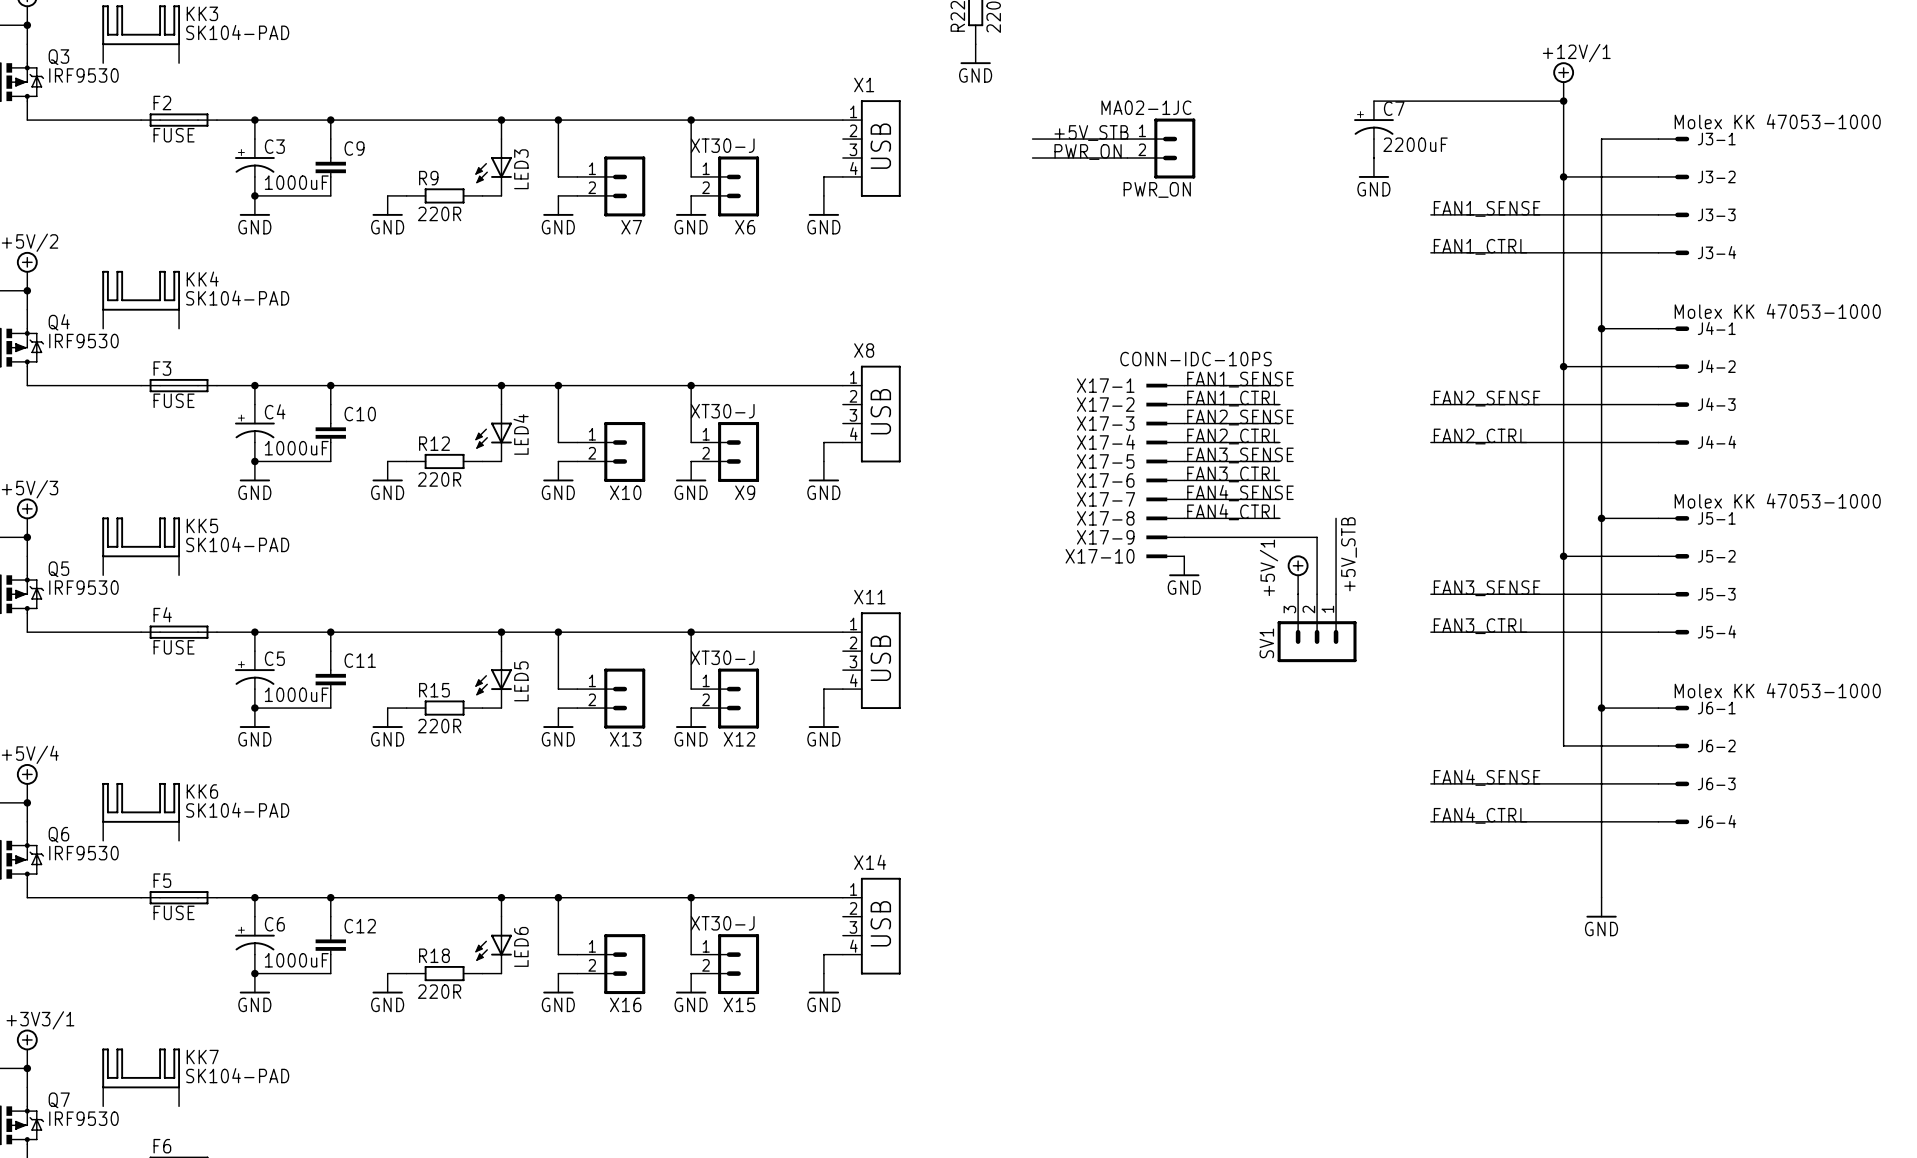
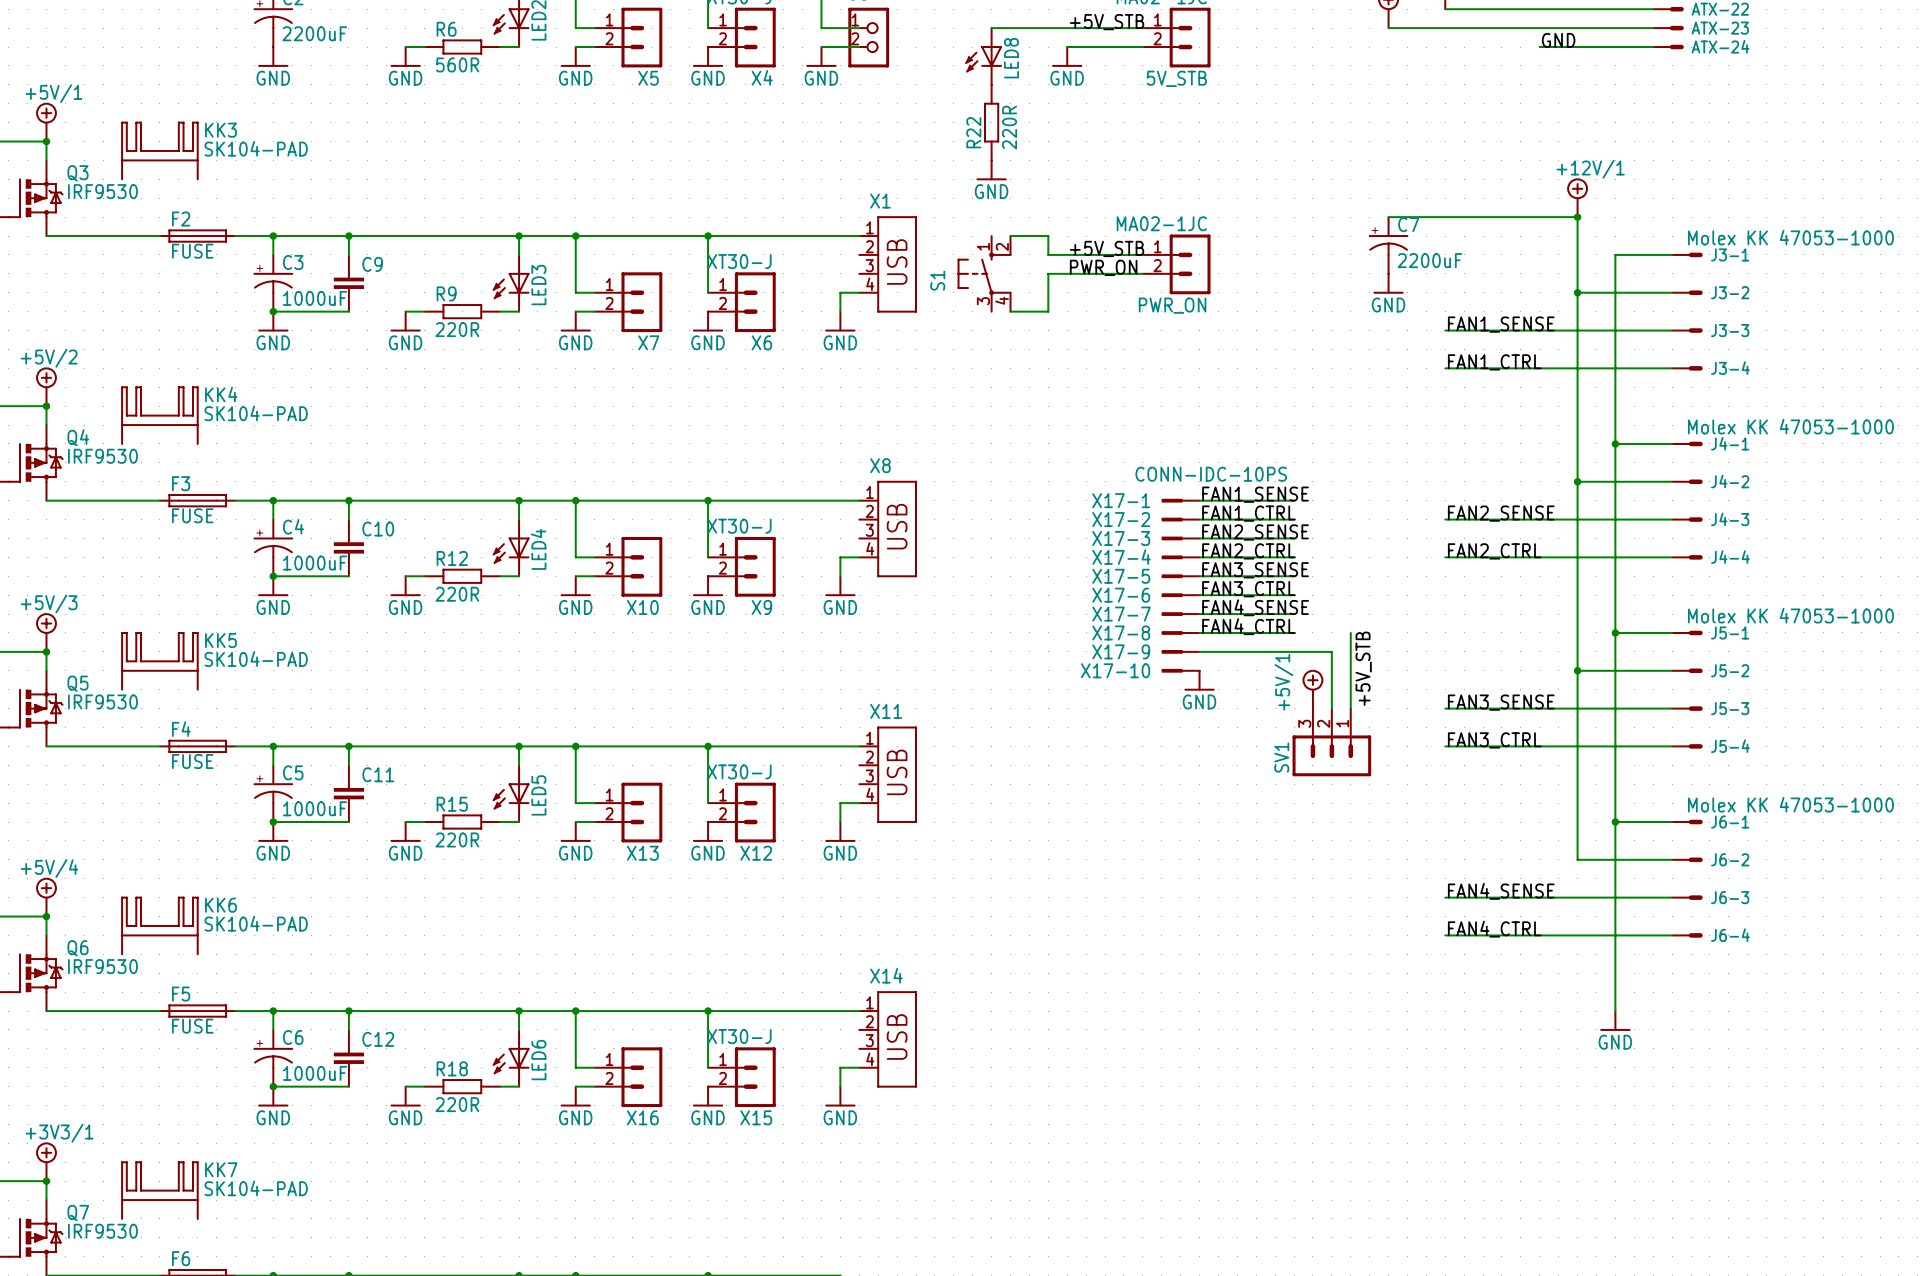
wire: none -> (1010, 236) (1048, 236) (1048, 254)
S1: none -> (984, 273)
wire: none -> (1048, 273) (1048, 311) (1010, 311)

